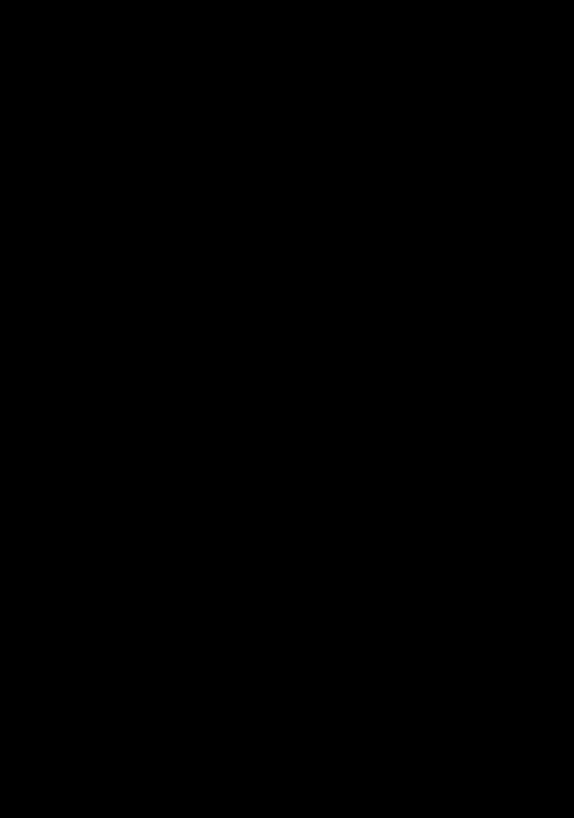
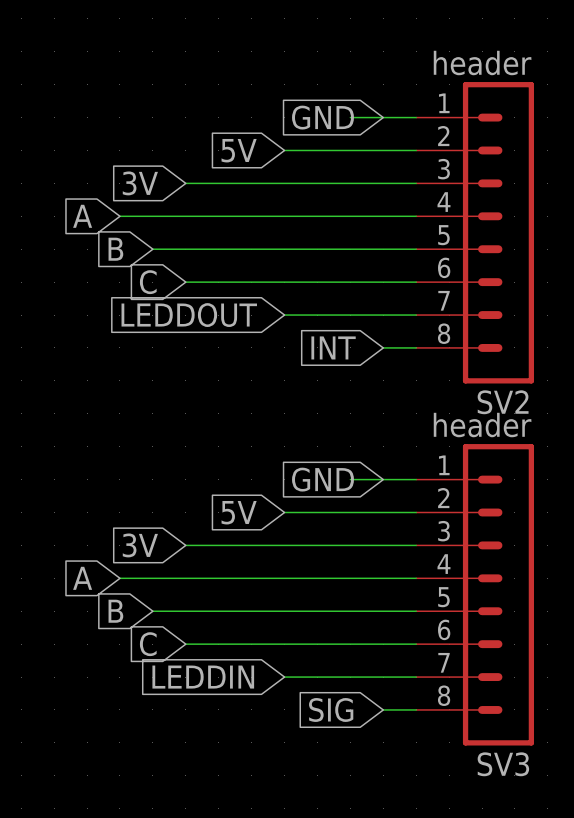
global label: none -> GND (322, 117)
wire: none -> (350, 117) (416, 117)
global label: none -> 5V (239, 150)
wire: none -> (284, 150) (416, 150)
global label: none -> 3V (140, 183)
wire: none -> (185, 183) (416, 183)
global label: none -> A (82, 216)
wire: none -> (119, 216) (416, 216)
SV2: none -> header (475, 232)
global label: none -> B (115, 249)
wire: none -> (152, 249) (416, 249)
global label: none -> C (148, 282)
wire: none -> (185, 282) (416, 282)
global label: none -> LEDDOUT (189, 315)
wire: none -> (284, 315) (416, 315)
global label: none -> INT (333, 347)
wire: none -> (383, 347) (416, 347)
global label: none -> GND (322, 479)
wire: none -> (350, 479) (416, 479)
global label: none -> 5V (239, 512)
wire: none -> (284, 512) (416, 512)
global label: none -> 3V (140, 545)
wire: none -> (185, 545) (416, 545)
global label: none -> A (82, 578)
wire: none -> (119, 578) (416, 578)
SV3: none -> header (475, 594)
global label: none -> B (115, 611)
wire: none -> (152, 611) (416, 611)
global label: none -> C (148, 644)
wire: none -> (185, 644) (416, 644)
global label: none -> LEDDIN (203, 677)
wire: none -> (284, 677) (416, 677)
global label: none -> SIG (331, 709)
wire: none -> (383, 709) (416, 709)

